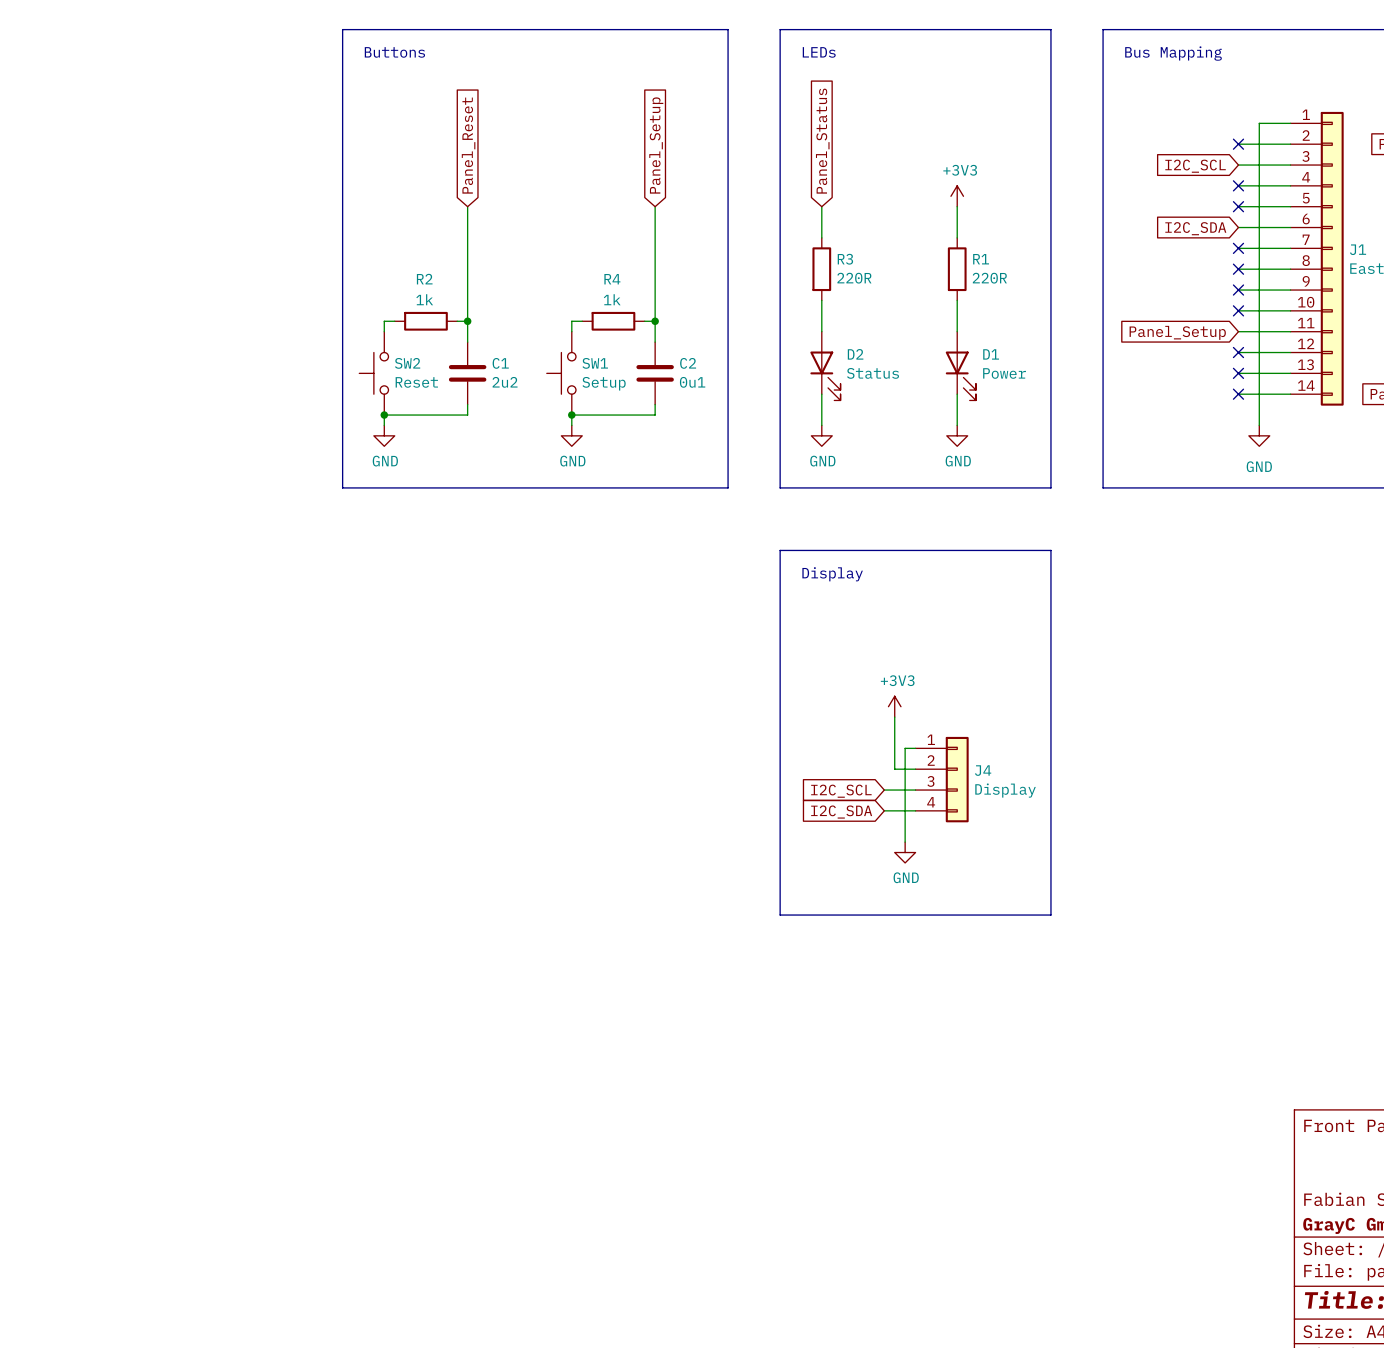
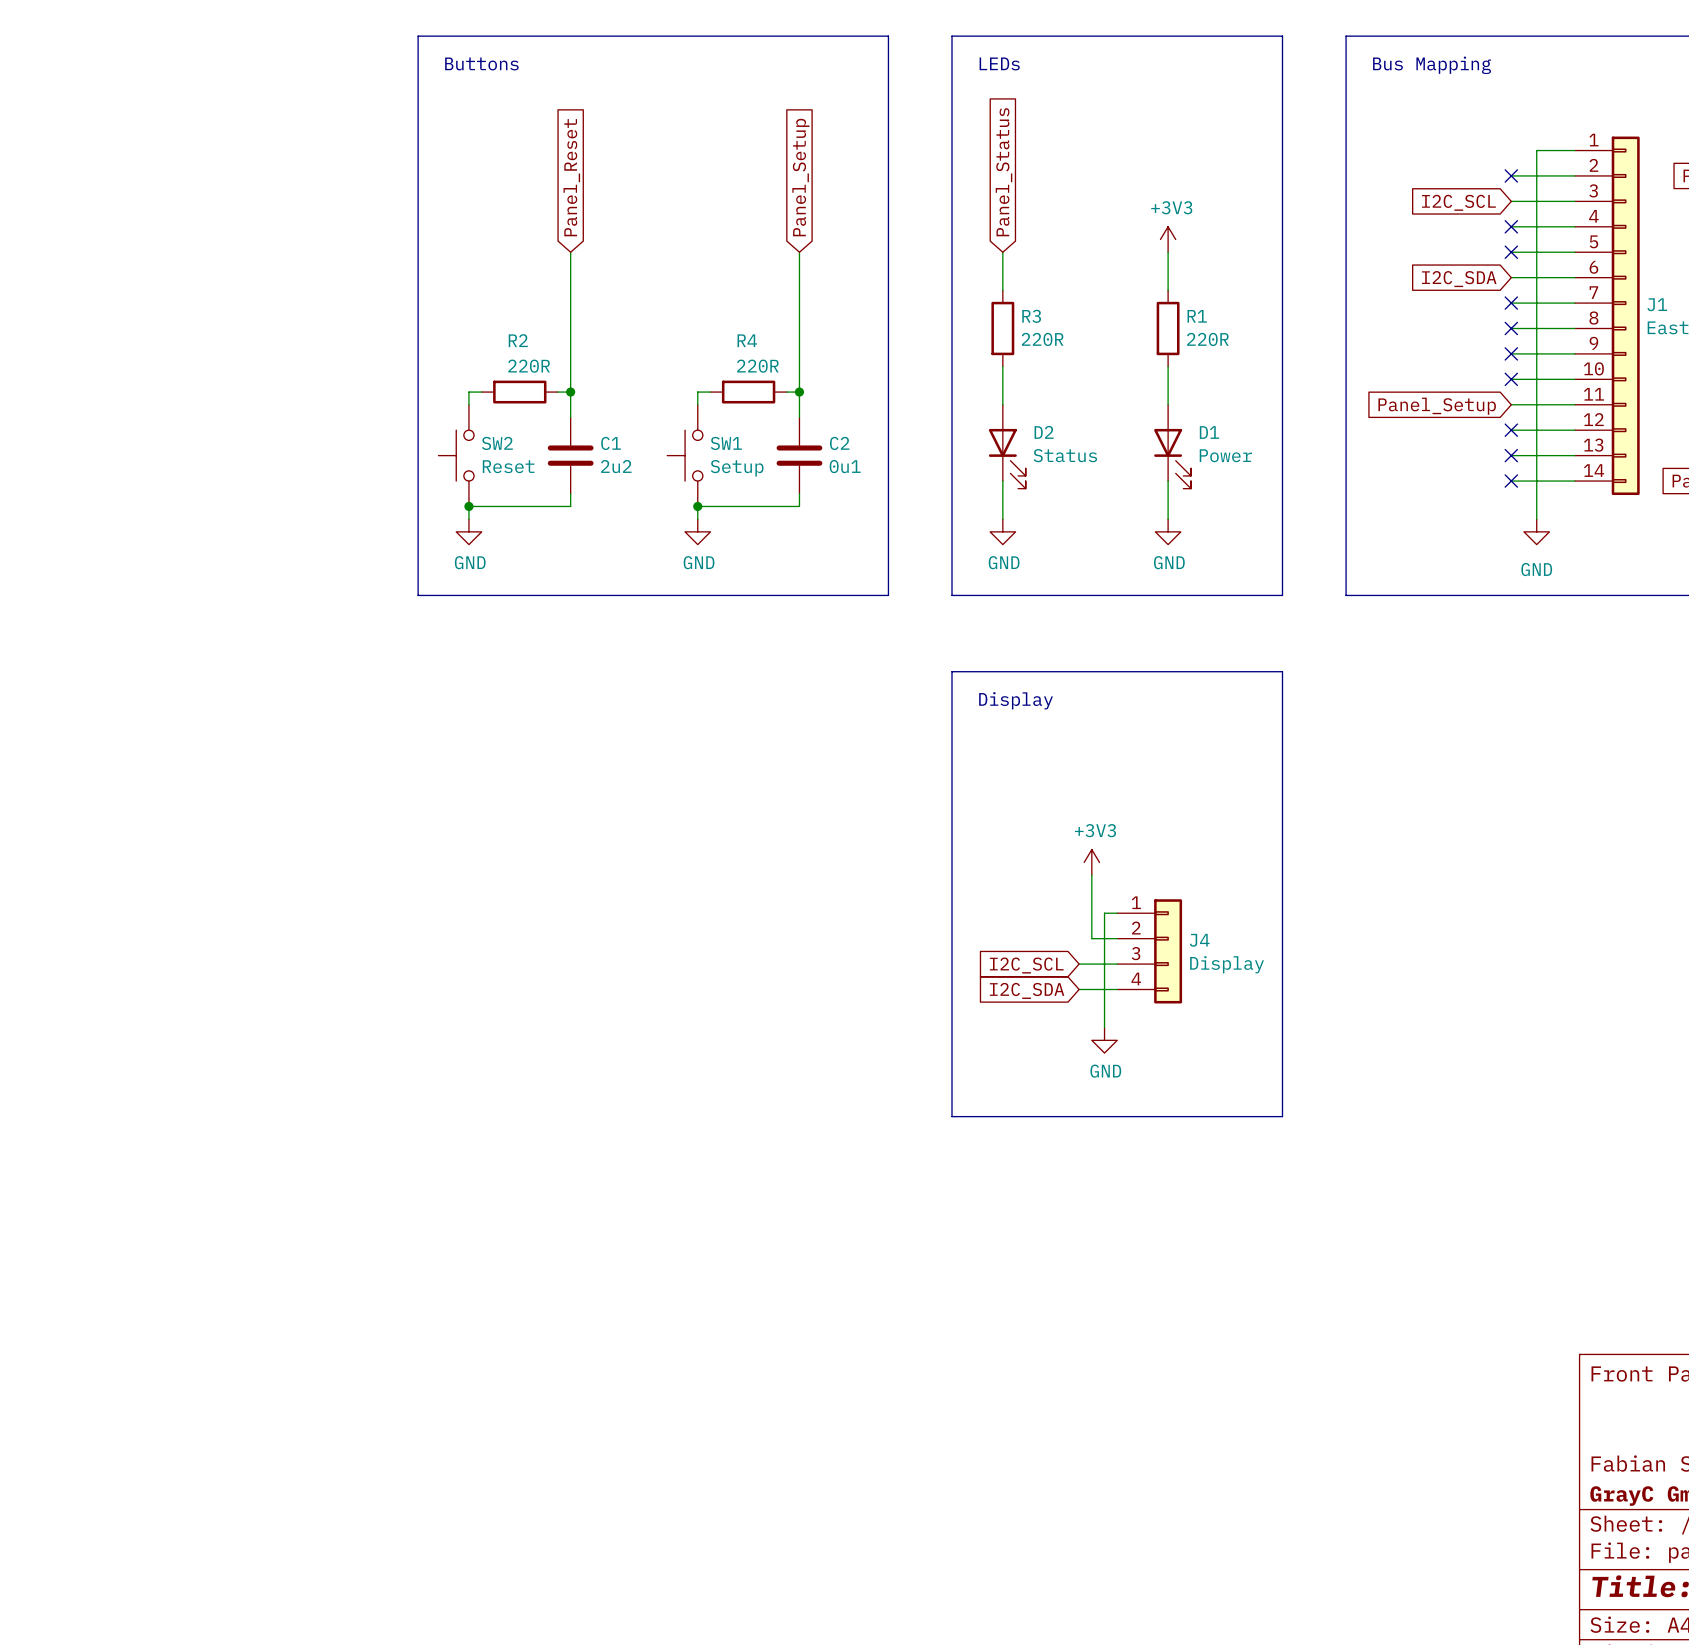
R2 value: 1k (424, 299) -> 220R (529, 366)
R4 value: 1k (612, 299) -> 220R (757, 366)

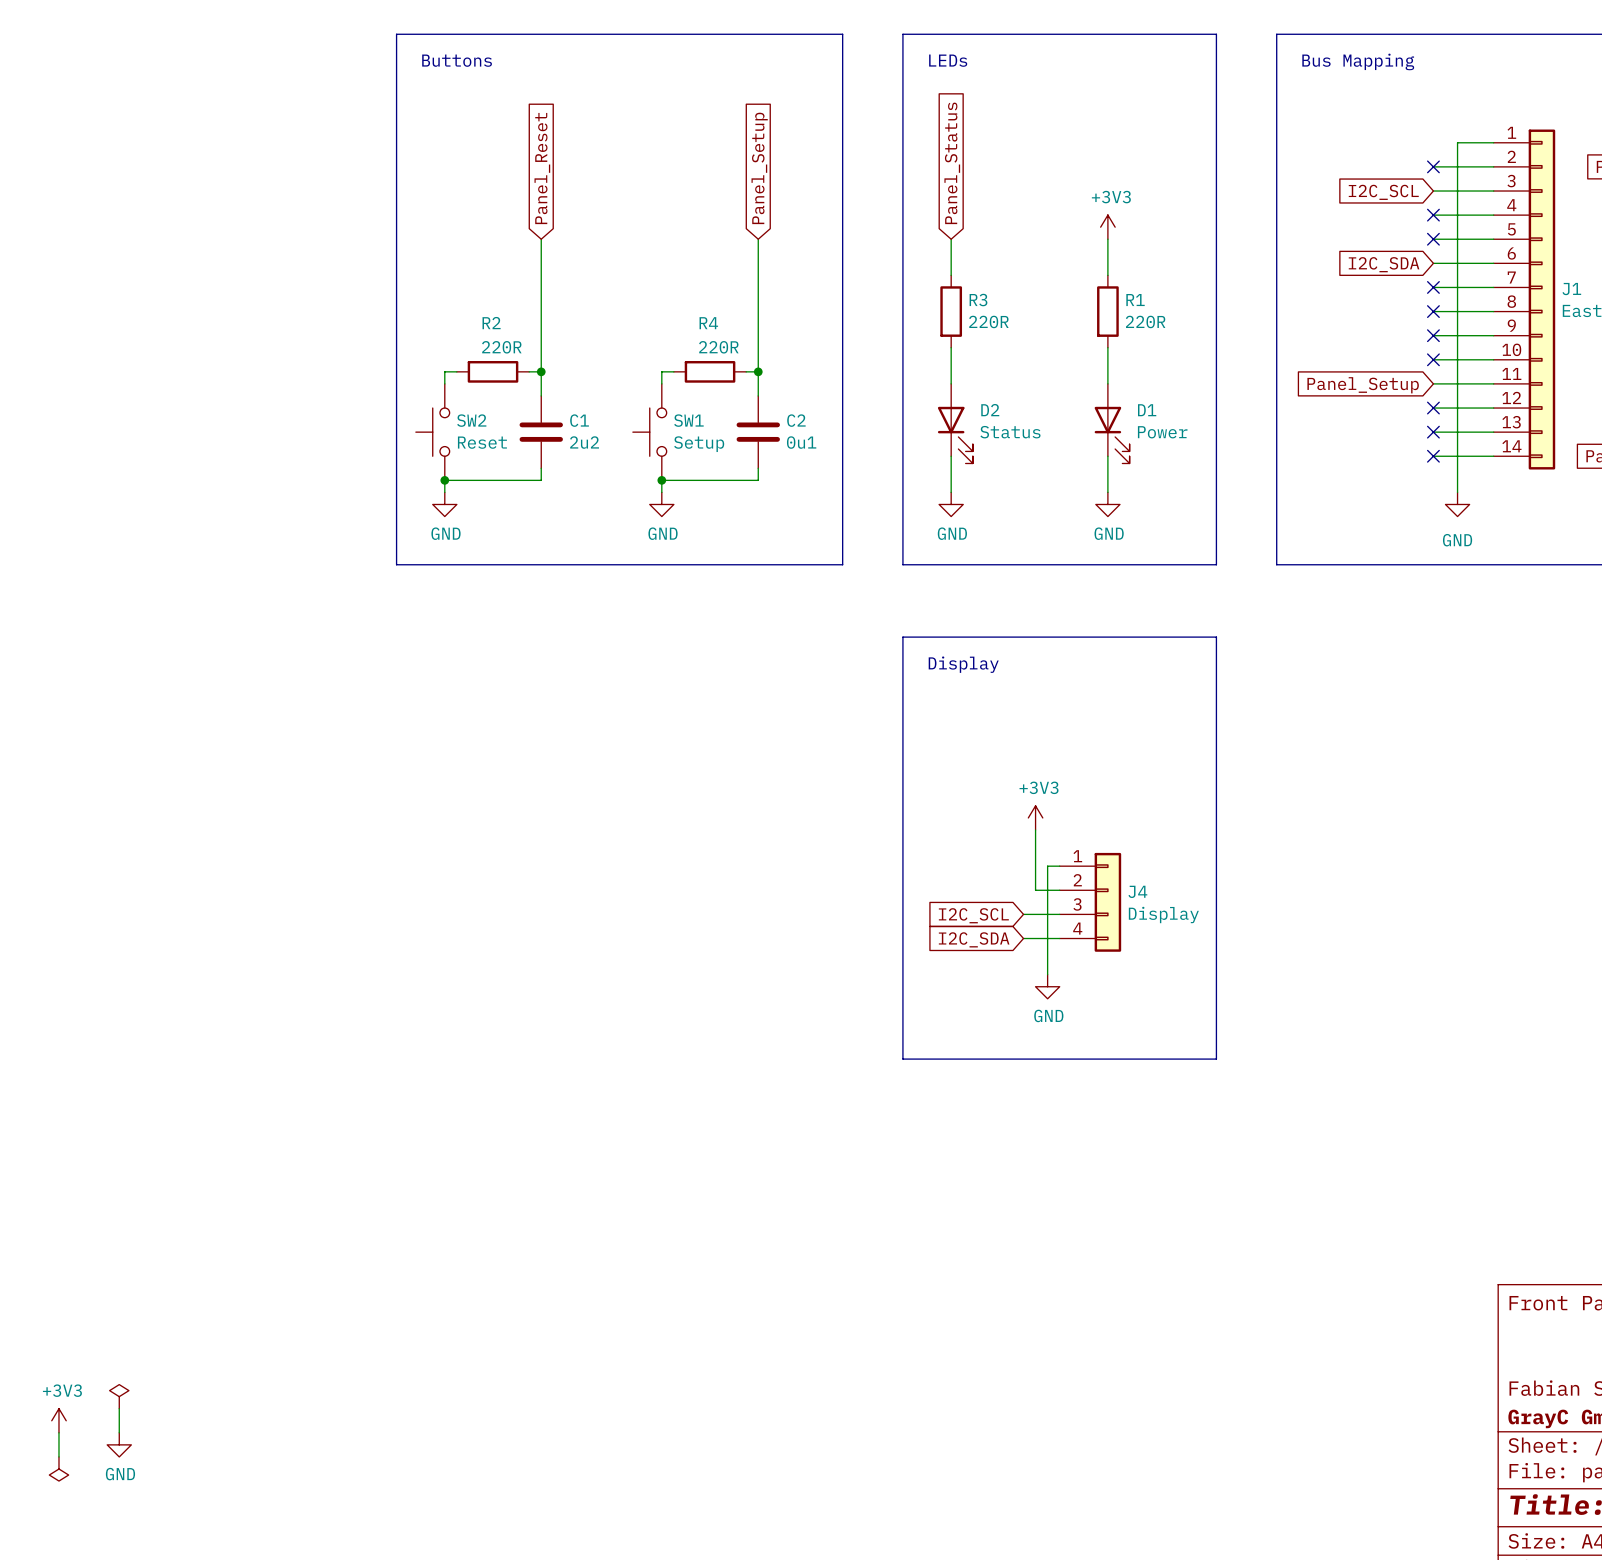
power symbol: none -> (119, 1396)
wire: none -> (119, 1408) (119, 1432)
power symbol: none -> +3V3 (58, 1420)
wire: none -> (58, 1432) (58, 1456)
power symbol: none -> GND (119, 1444)
power symbol: none -> (58, 1469)

